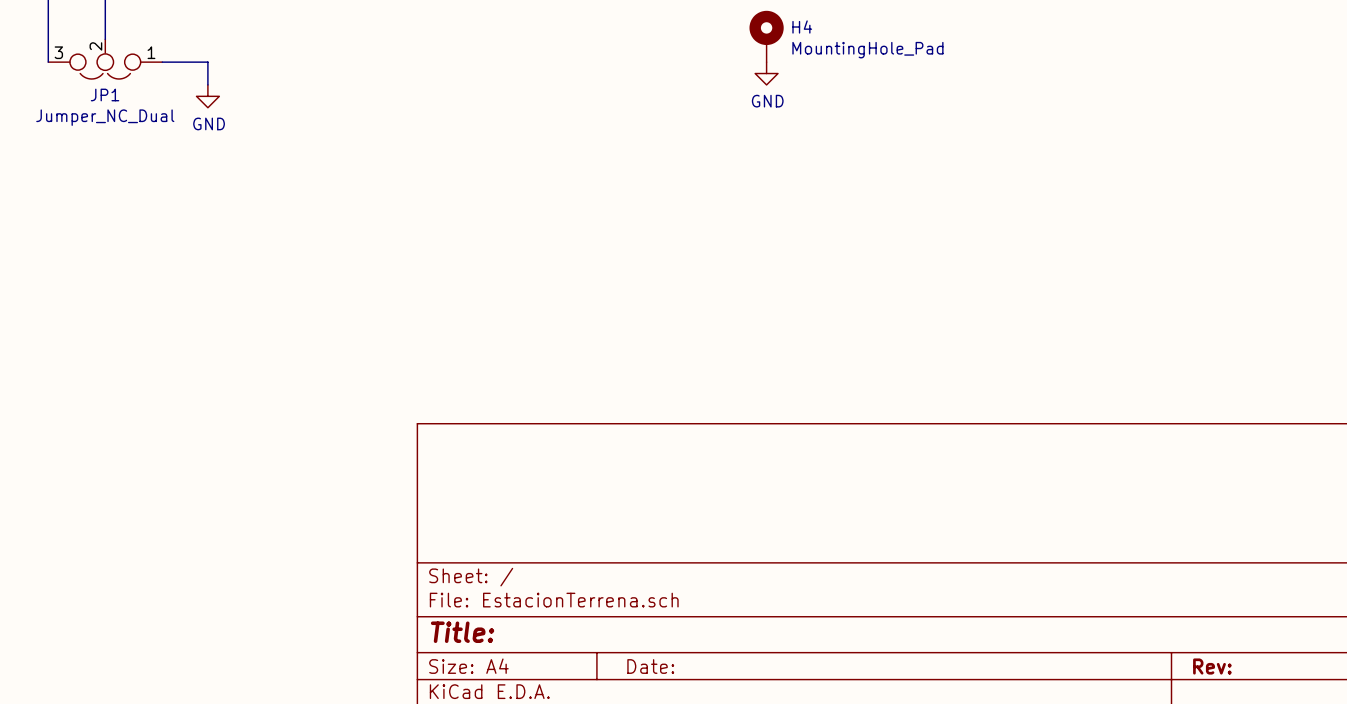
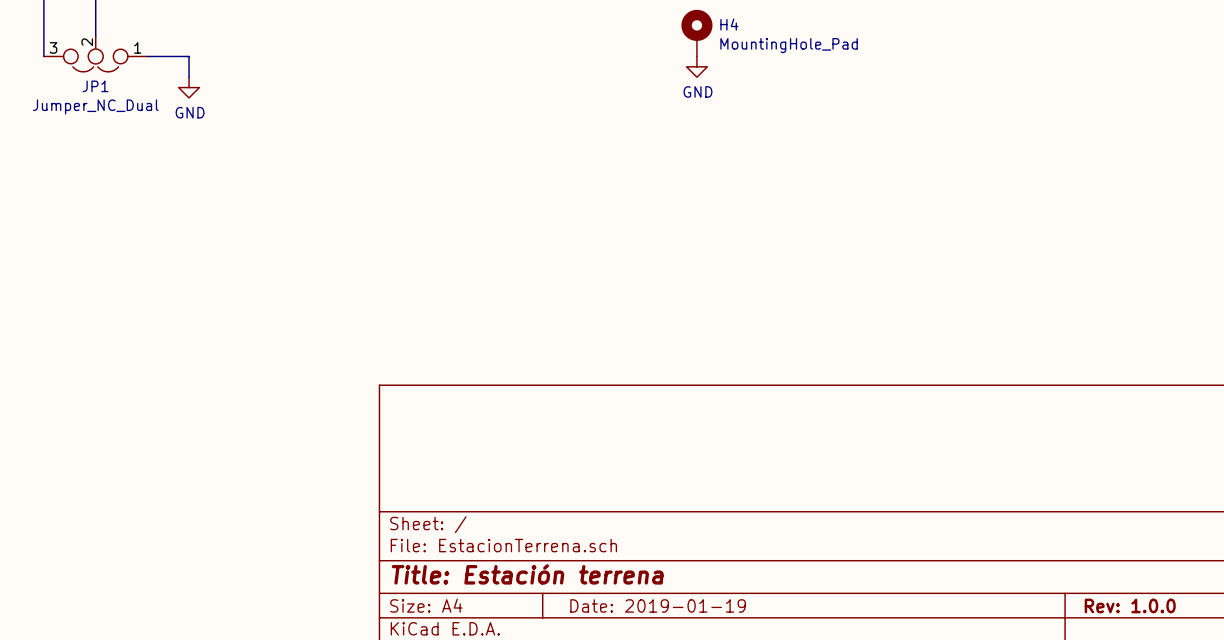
title block: Title: (462, 632) -> Title: Estación terrena (527, 574)
title block: Date: (650, 666) -> Date: 2019-01-19 (658, 605)
title block: Rev: (1212, 666) -> Rev: 1.0.0 (1130, 605)

